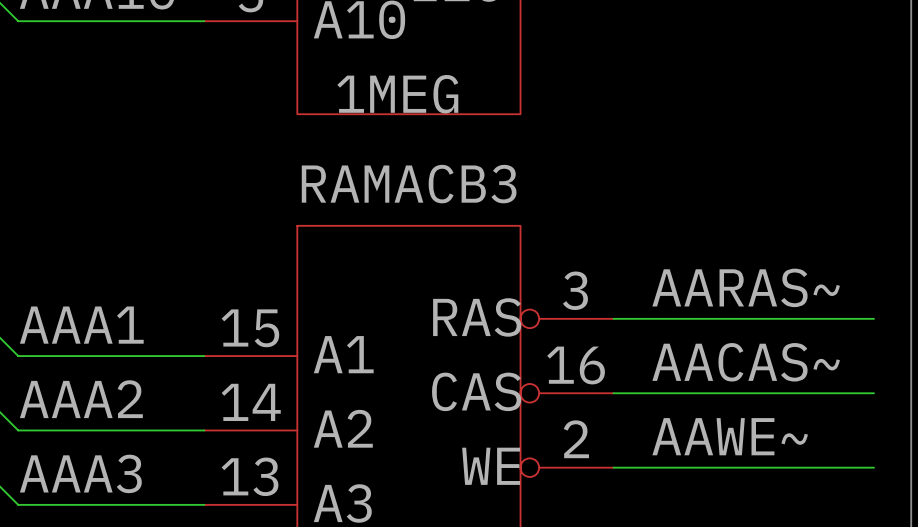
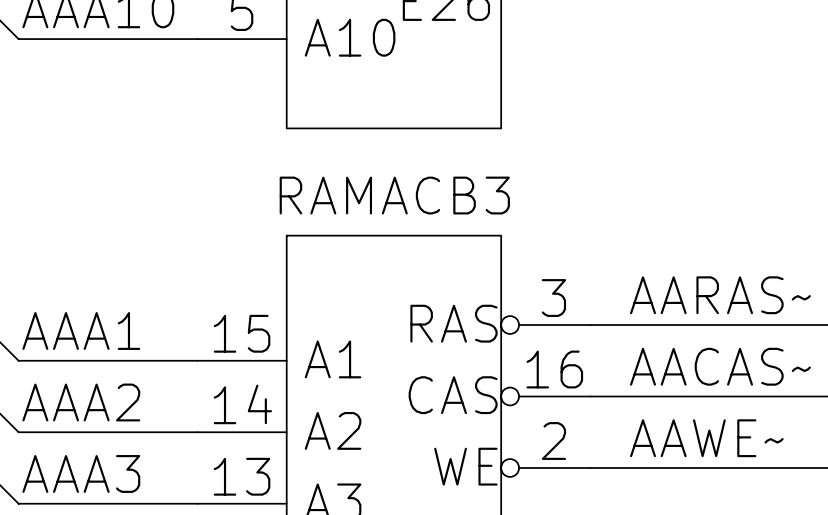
part value: 1MEG (397, 94) -> none

